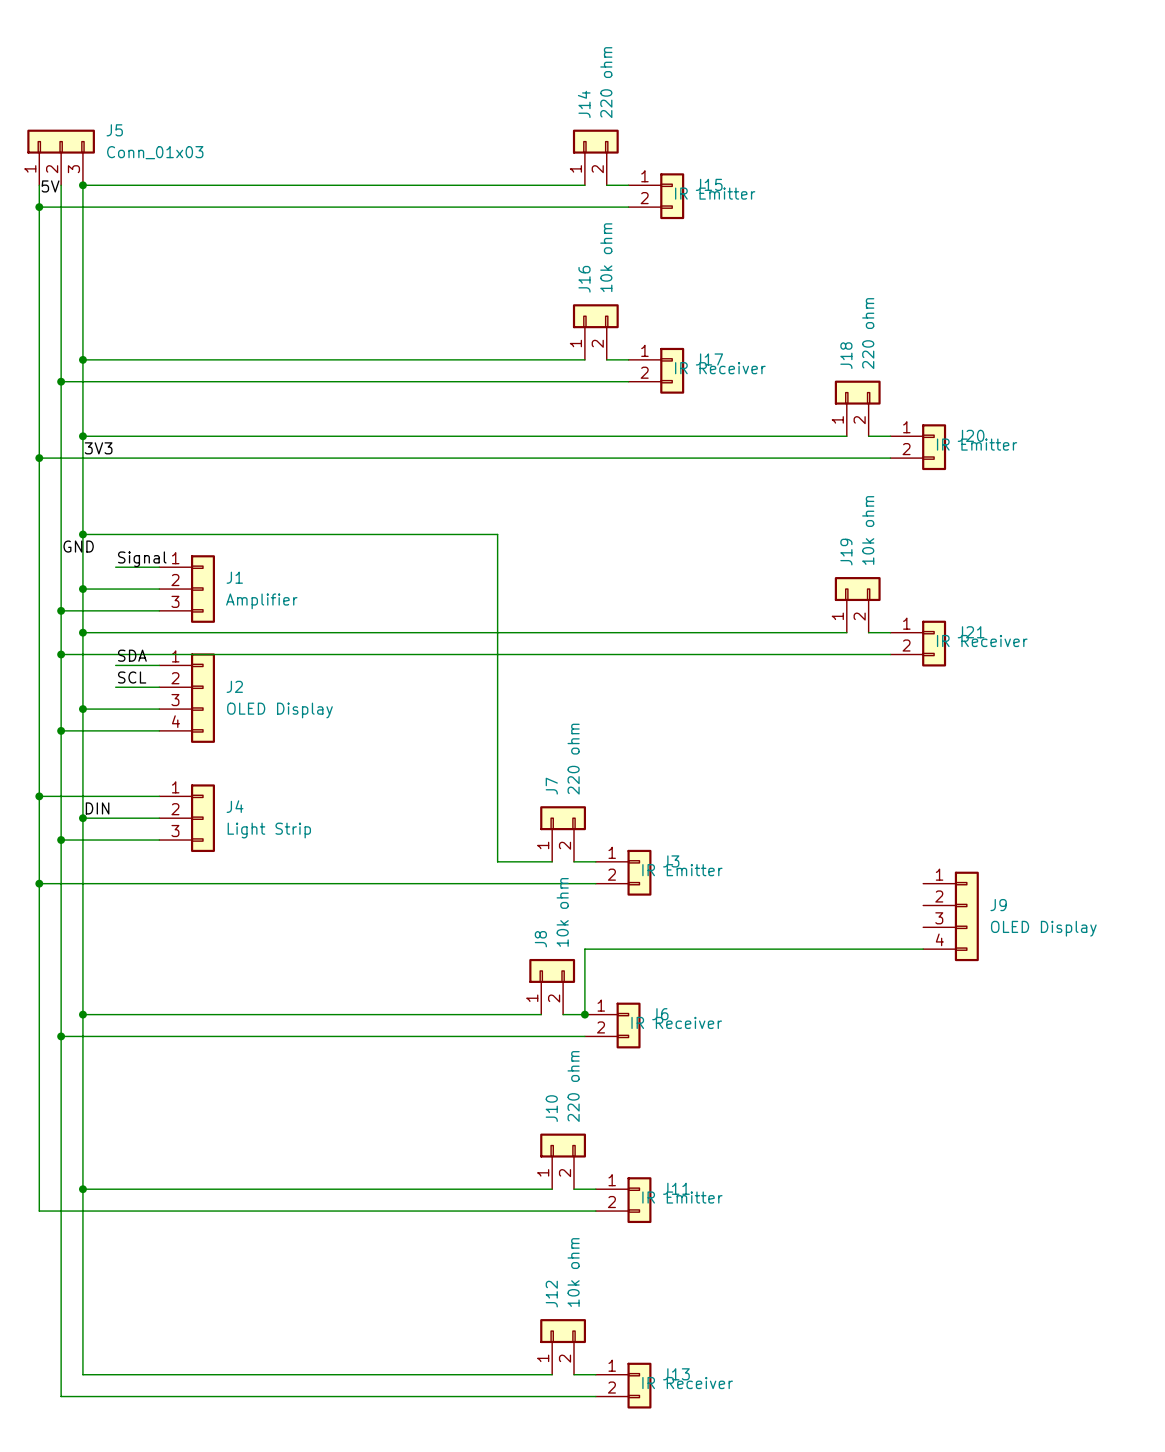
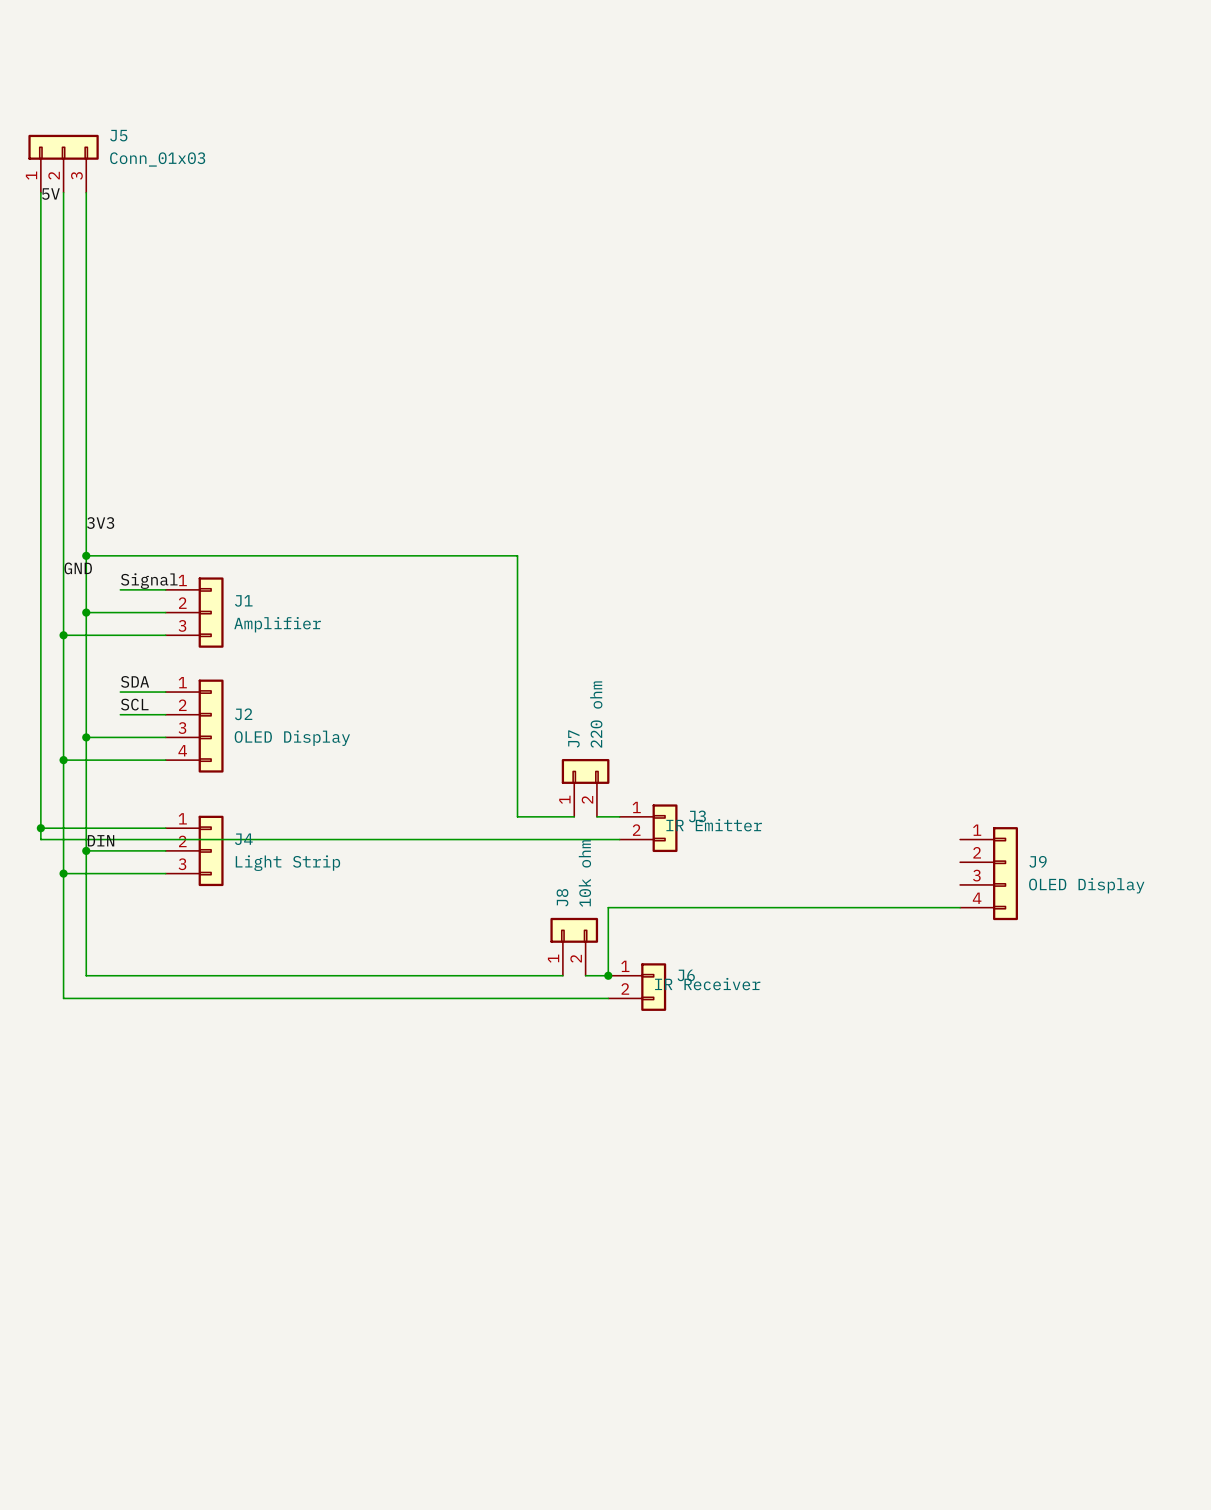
J14: 220 ohm (595, 157) -> none
wire: (82, 185) (584, 185) -> none
junction: (82, 185) -> none
wire: (606, 185) (628, 185) -> none
J15: IR Emitter (656, 196) -> none
wire: (39, 207) (628, 207) -> none
junction: (39, 207) -> none
J16: 10k ohm (595, 332) -> none
wire: (82, 359) (584, 359) -> none
junction: (82, 359) -> none
wire: (606, 359) (628, 359) -> none
J17: IR Receiver (656, 370) -> none
wire: (61, 381) (628, 381) -> none
junction: (61, 381) -> none
J18: 220 ohm (857, 408) -> none
wire: (82, 436) (846, 436) -> none
junction: (82, 436) -> none
wire: (868, 436) (890, 436) -> none
J20: IR Emitter (918, 447) -> none
label position: 3V3 (98, 448) -> 3V3 (100, 523)
wire: (39, 458) (890, 458) -> none
junction: (39, 458) -> none
J19: 10k ohm (857, 604) -> none
wire: (82, 632) (846, 632) -> none
junction: (82, 632) -> none
wire: (868, 632) (890, 632) -> none
J21: IR Receiver (918, 643) -> none
wire: (61, 654) (890, 654) -> none
junction: (61, 654) -> none
wire: (497, 785) (497, 861) (552, 861) -> (517, 816) (574, 816)
wire: (39, 807) (39, 1211) (595, 1211) -> (40, 839) (619, 839)
J7 position: (563, 834) -> (585, 787)
wire: (574, 861) (595, 861) -> (596, 816) (619, 816)
J3 position: (623, 872) -> (648, 828)
wire: (39, 883) (595, 883) -> none
junction: (39, 883) -> none
J9 position: (951, 916) -> (989, 873)
wire: (82, 938) (82, 1374) (552, 1374) -> (86, 975) (562, 975)
junction: none -> (608, 975)
wire: (923, 949) (584, 949) (584, 1014) (563, 1014) -> (960, 907) (608, 907) (608, 975) (585, 975)
wire: (61, 960) (61, 1396) (595, 1396) -> (63, 998) (608, 998)
J8 position: (552, 986) -> (574, 946)
wire: (82, 1014) (541, 1014) -> none
junction: (82, 1014) -> none
junction: (584, 1014) -> none
J6 position: (612, 1025) -> (637, 987)
wire: (61, 1036) (584, 1036) -> none
junction: (61, 1036) -> none
J10: 220 ohm (563, 1161) -> none
wire: (82, 1189) (552, 1189) -> none
junction: (82, 1189) -> none
wire: (574, 1189) (595, 1189) -> none
J11: IR Emitter (623, 1200) -> none
J12: 10k ohm (563, 1346) -> none
wire: (574, 1374) (595, 1374) -> none
J13: IR Receiver (623, 1385) -> none

